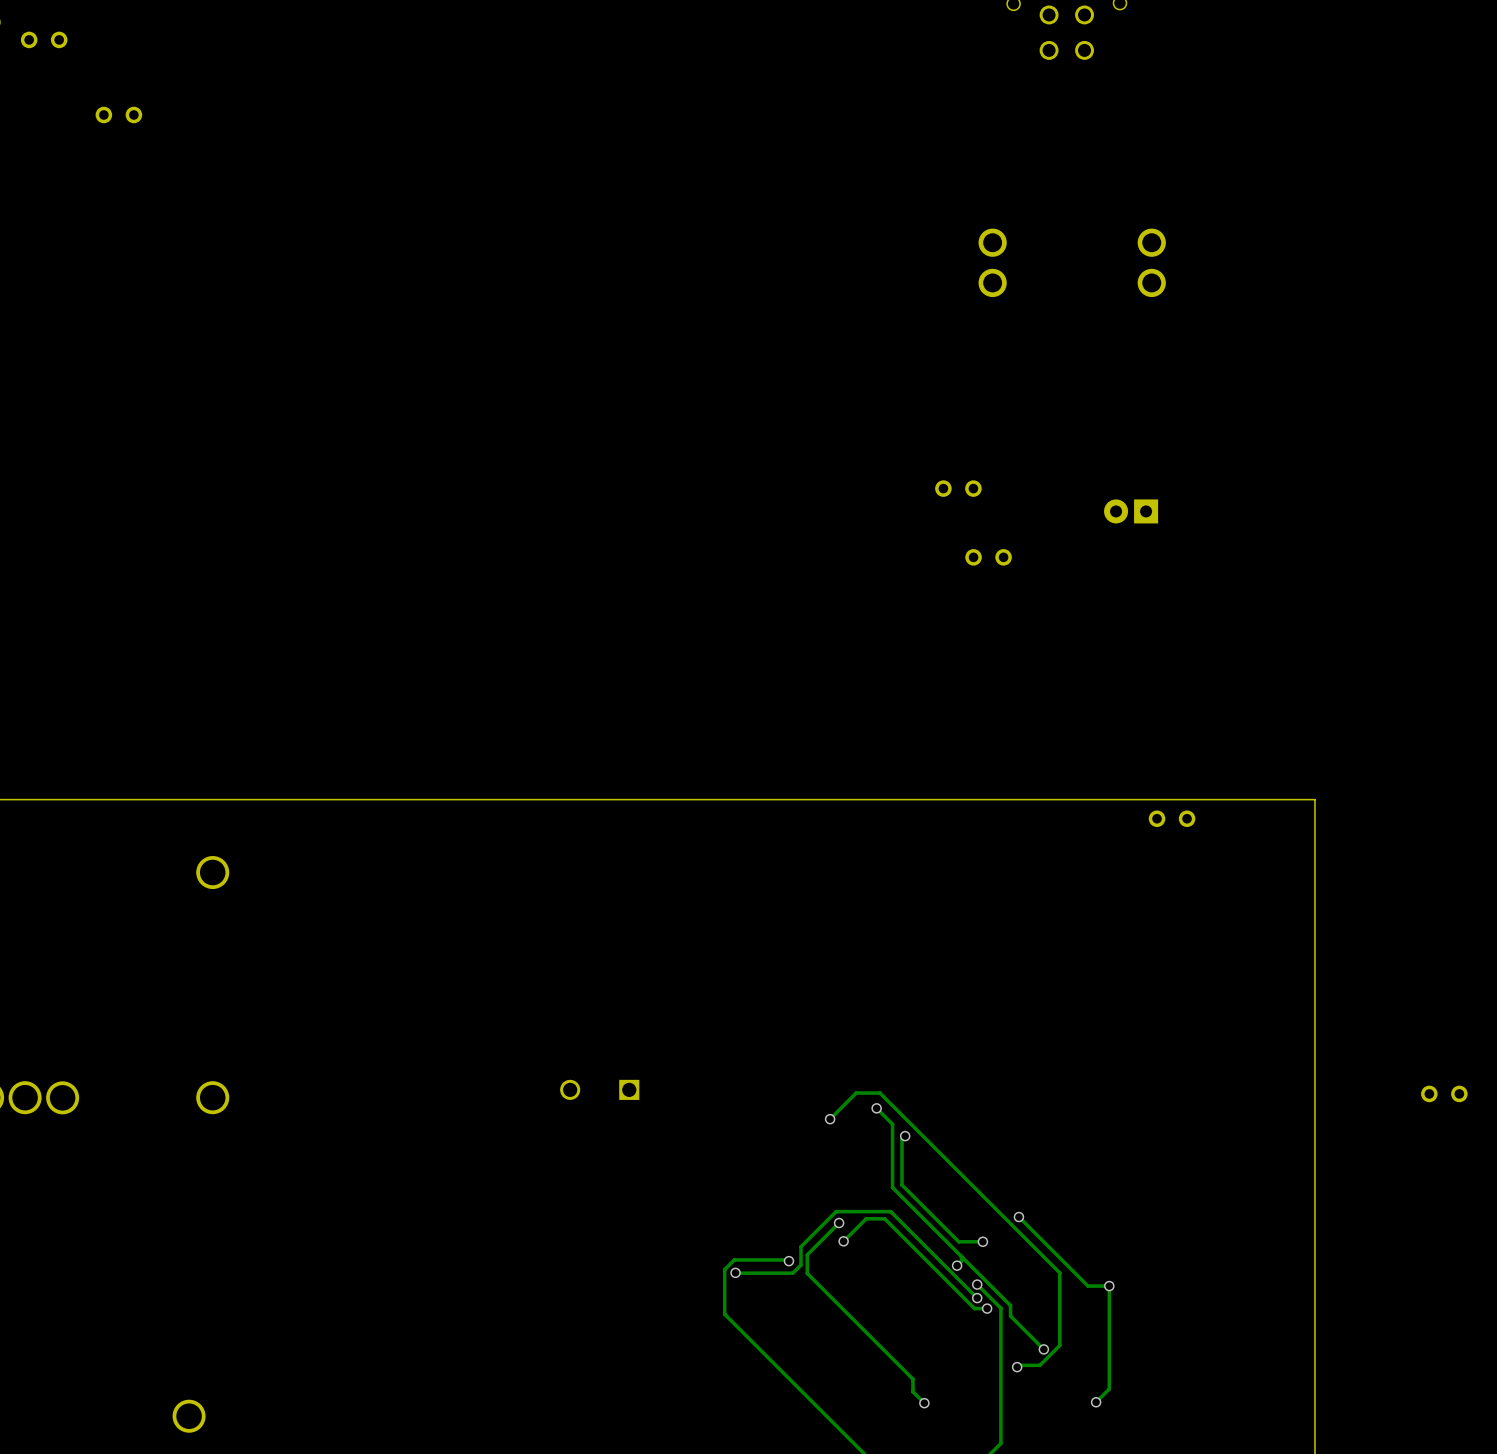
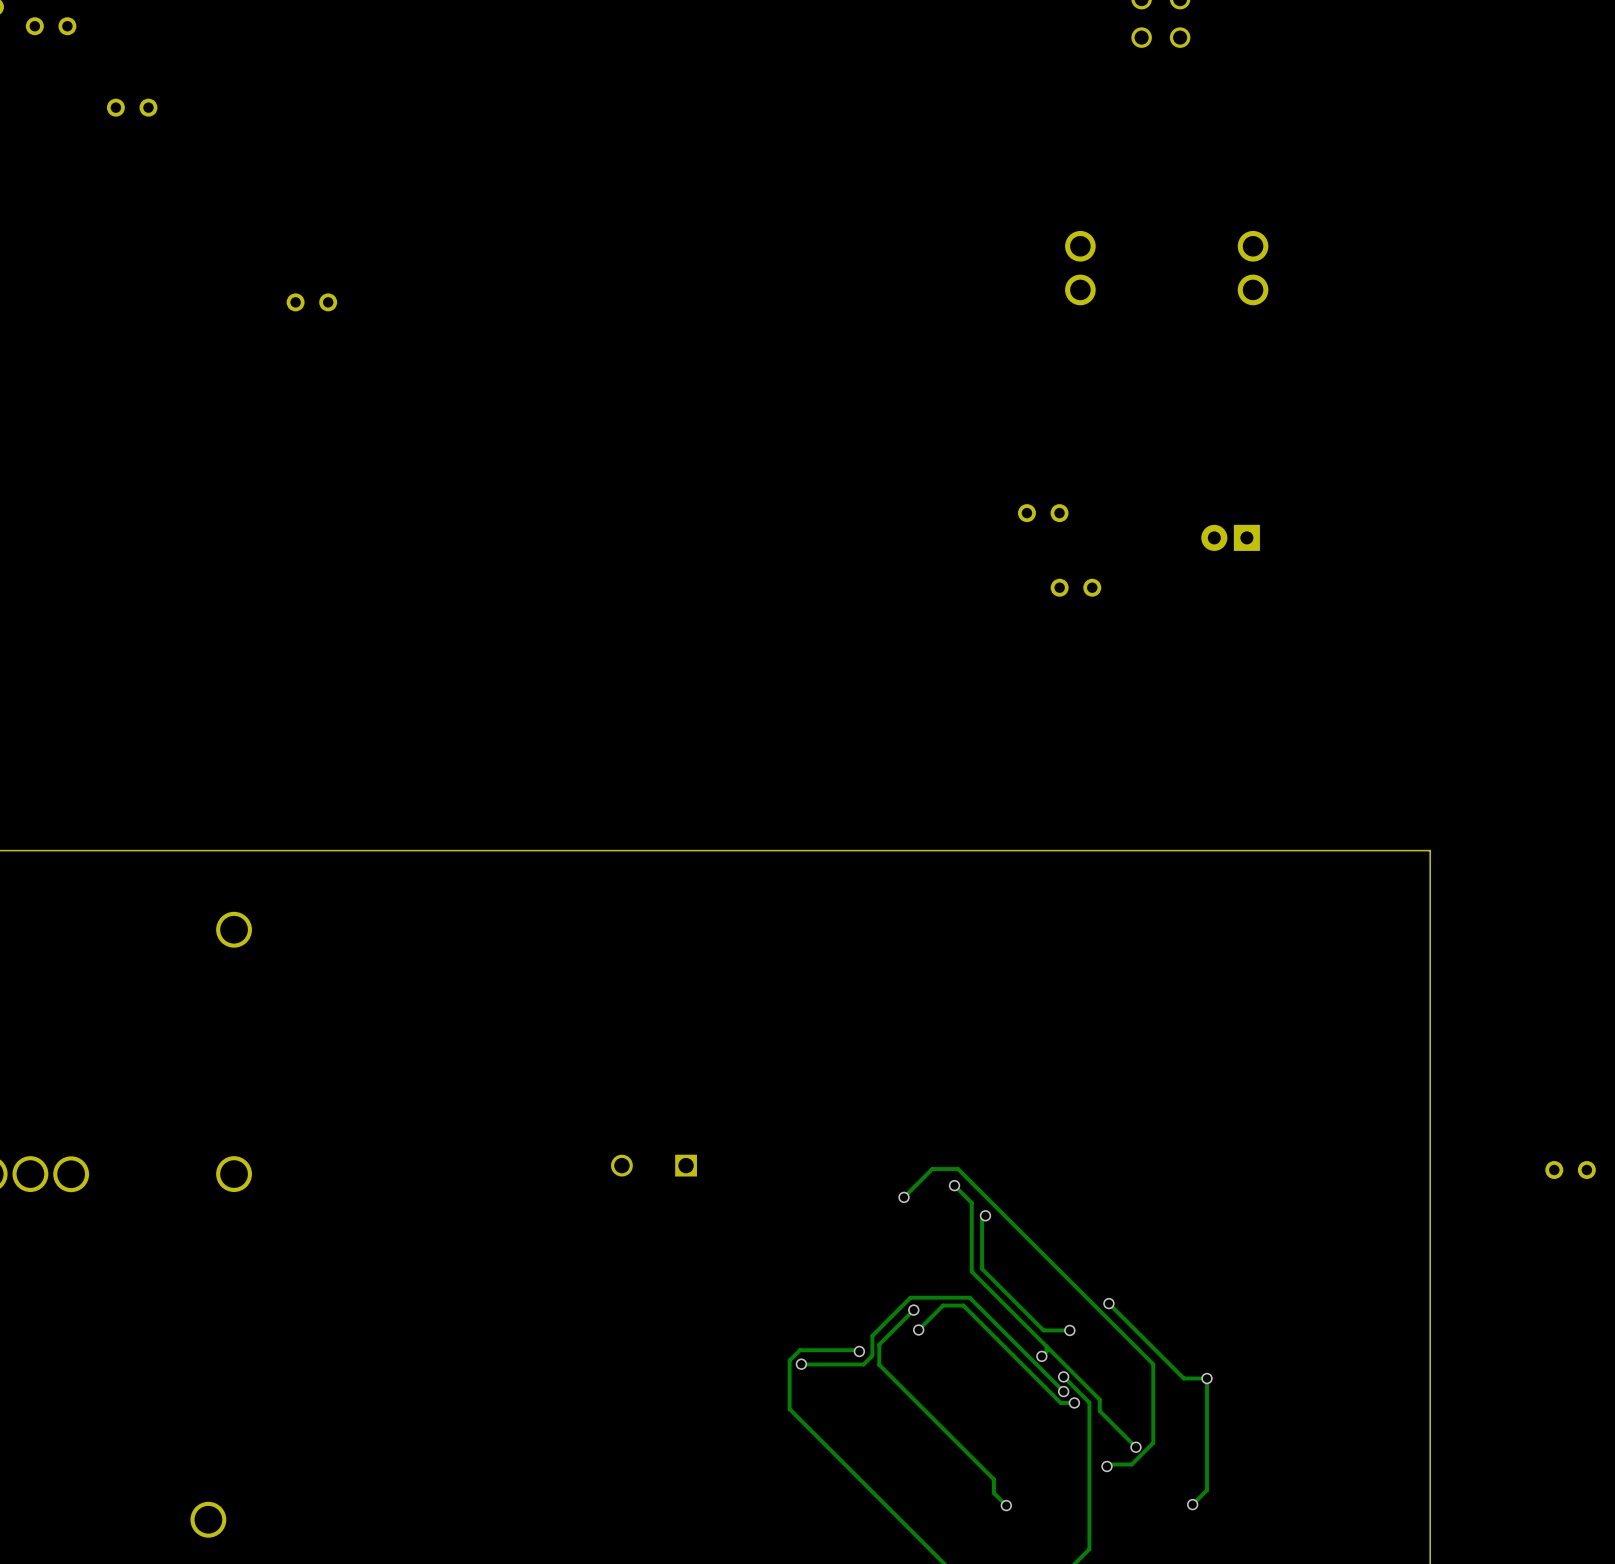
part: none -> (311, 302)
part: (1172, 818) -> none

